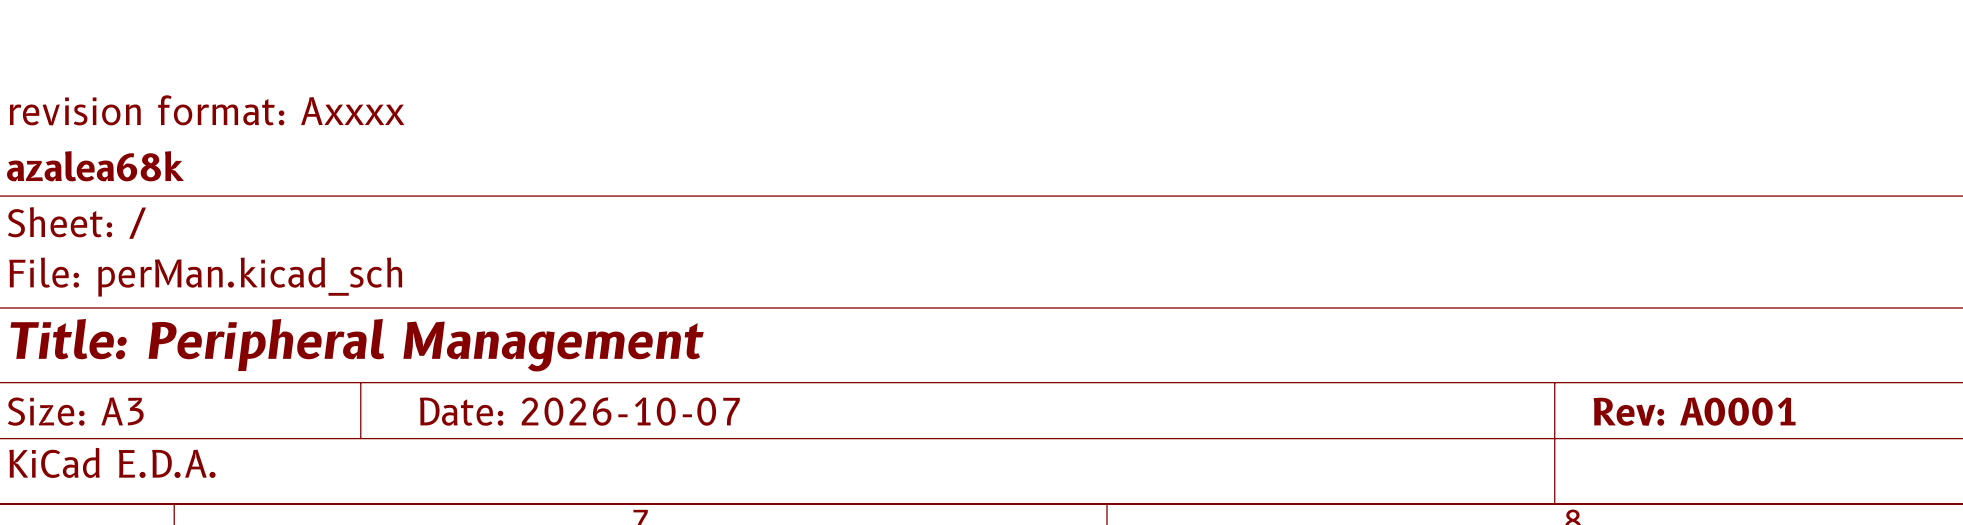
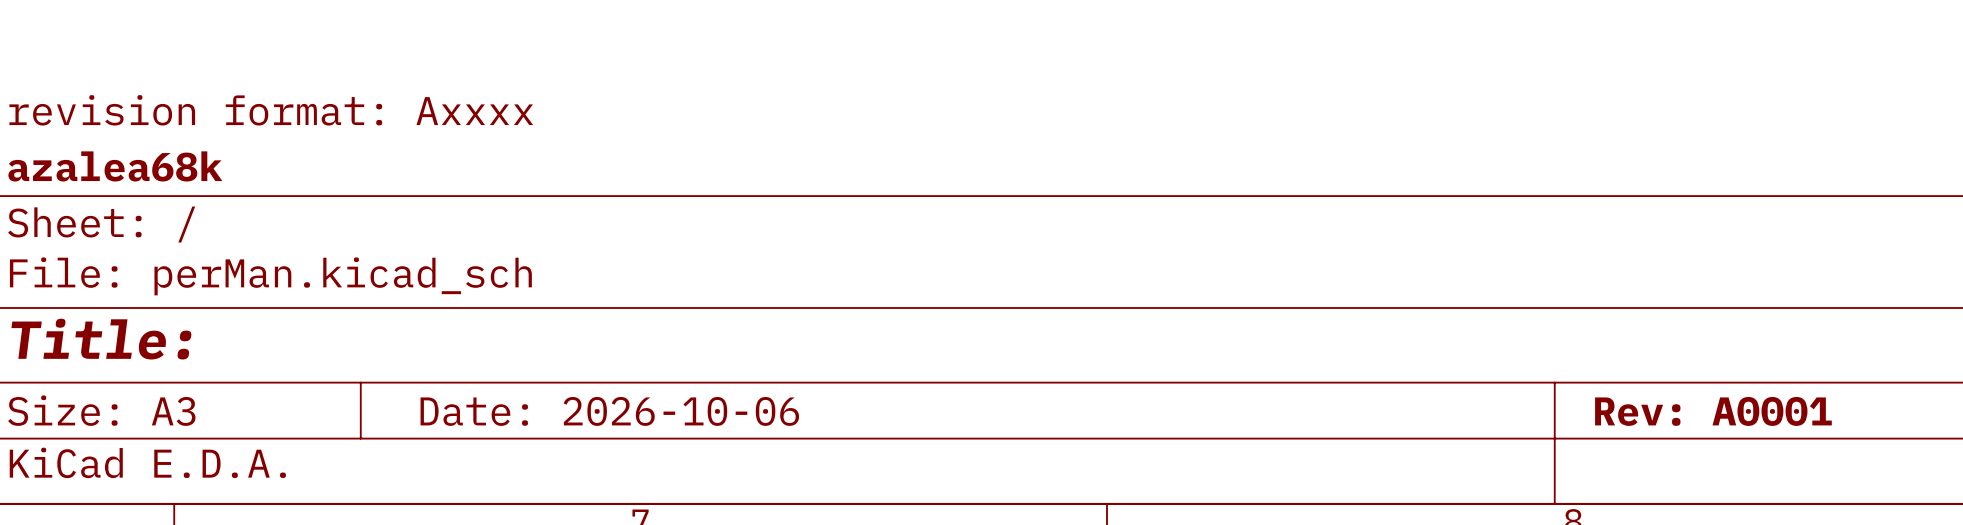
title block: Title: Peripheral Management (357, 345) -> Title: (101, 339)
title block: Date: 2026-10-07 (579, 411) -> Date: 2026-10-06 (609, 411)

